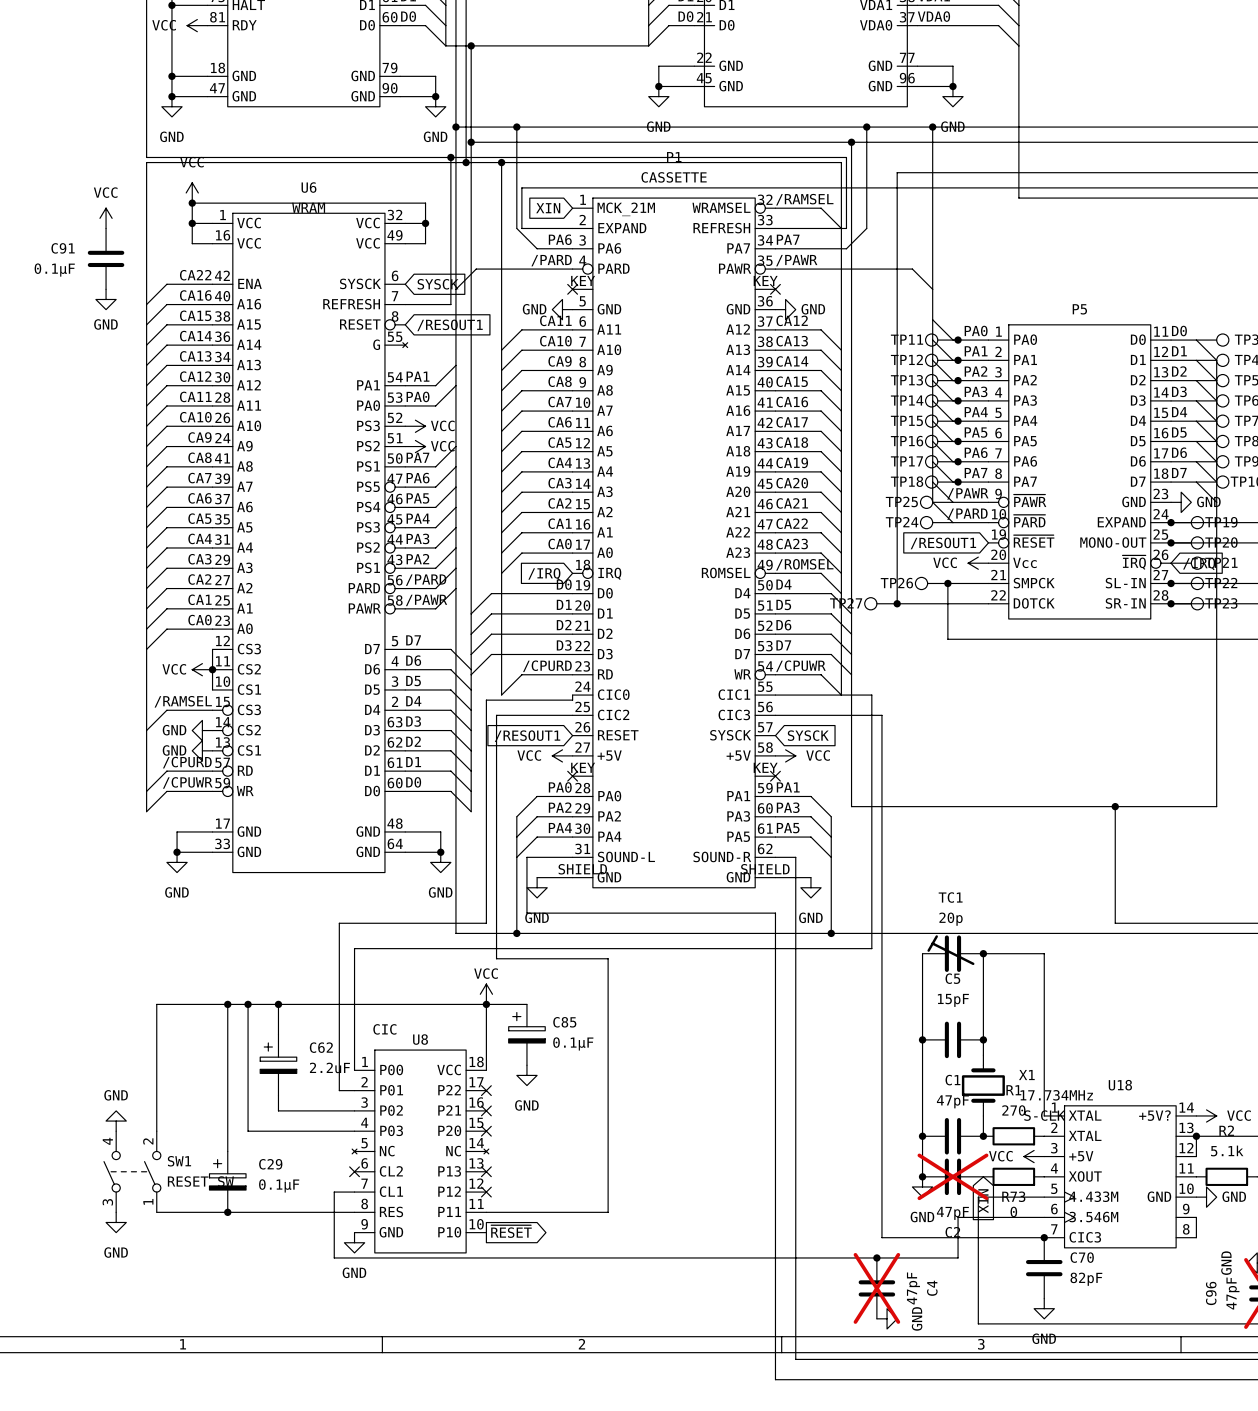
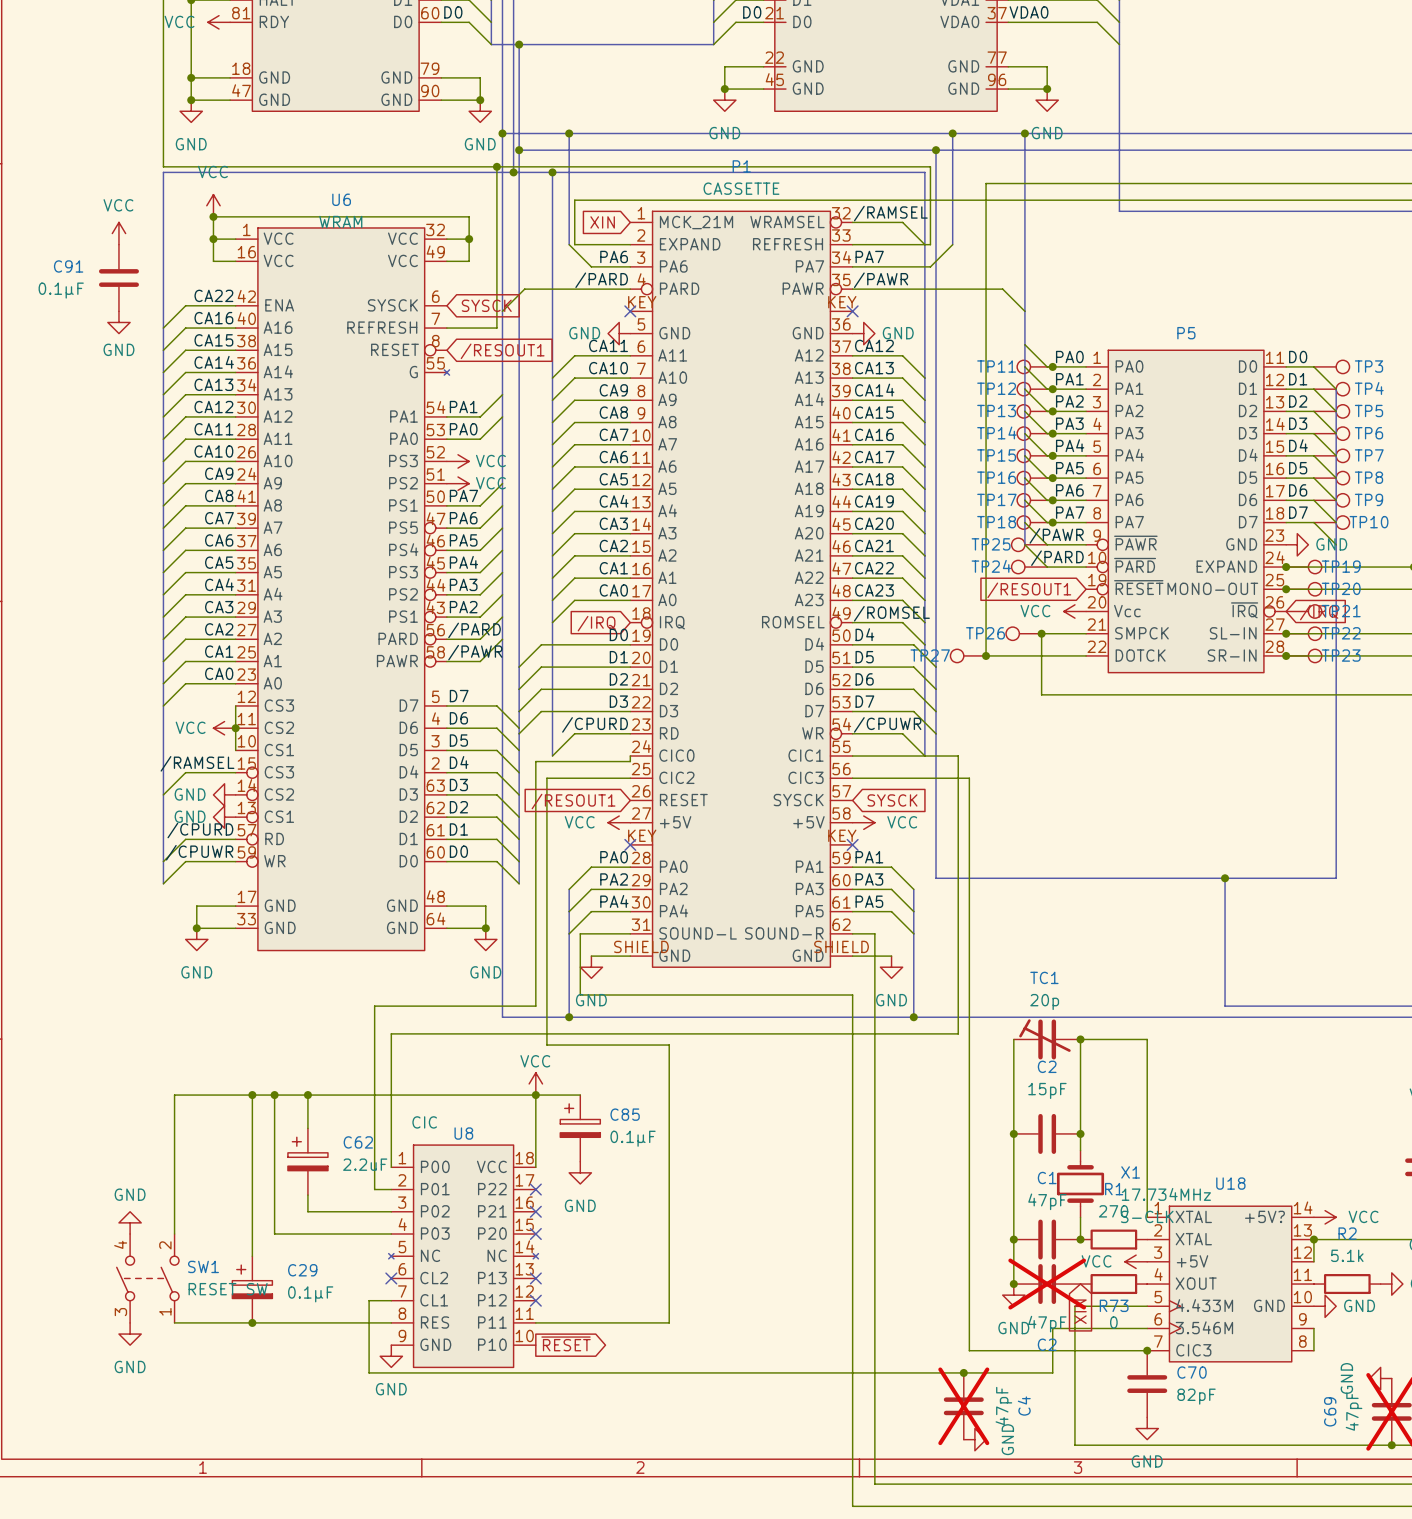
C5 name: C5 (952, 978) -> C2 (1047, 1066)
C96 name: C96 (1211, 1293) -> C69 (1330, 1411)

